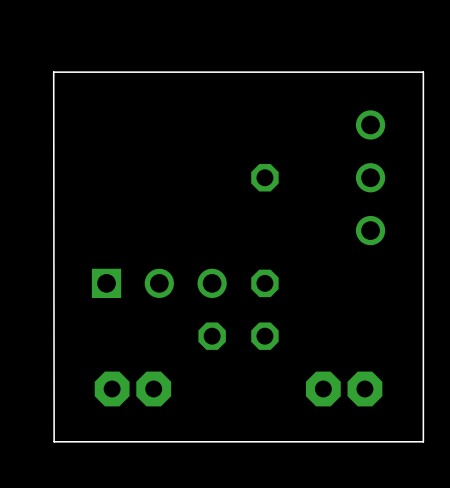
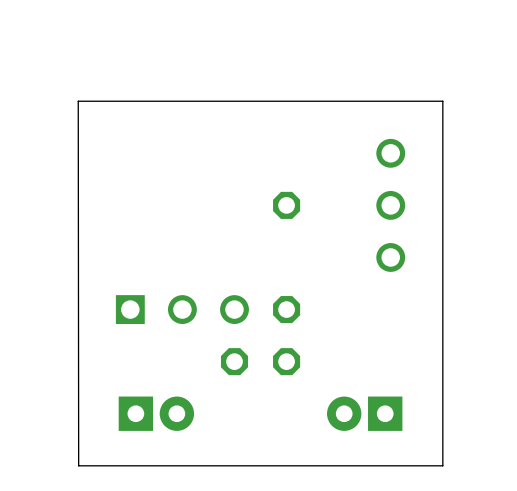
part footprint: [94, 371, 172, 407] -> [118, 396, 195, 431]
part footprint: [305, 371, 383, 407] -> [327, 396, 403, 431]

